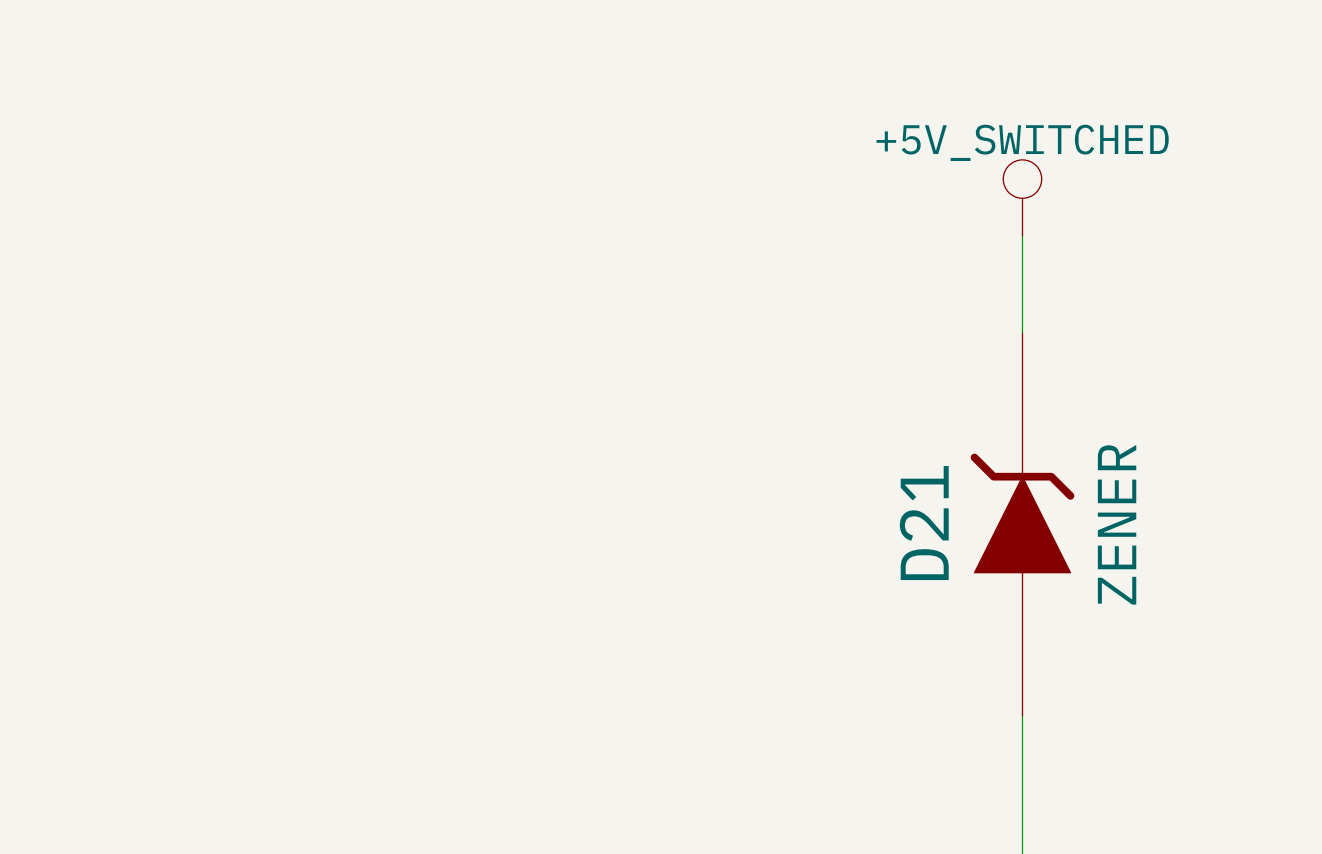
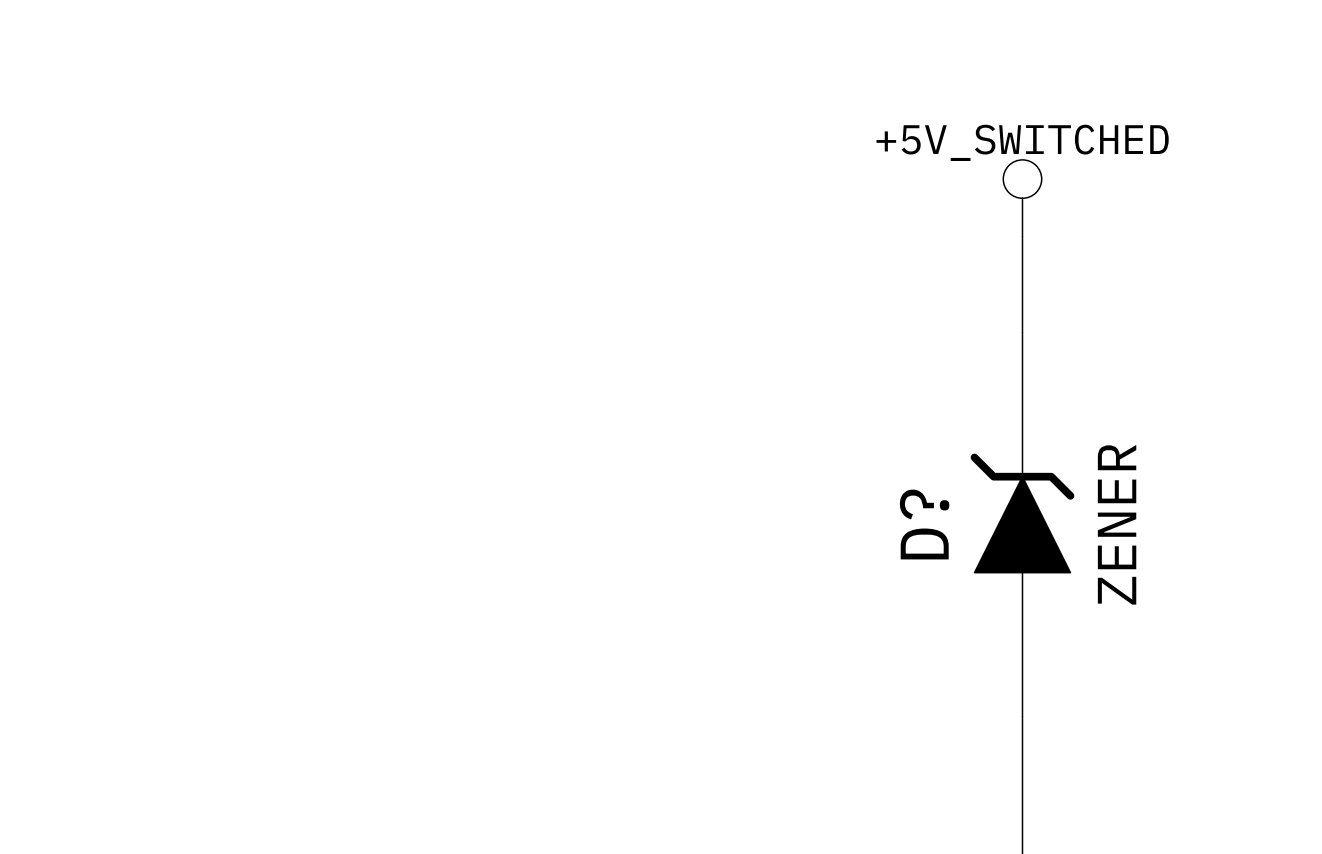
D21 name: D21 (924, 523) -> D? (924, 524)

